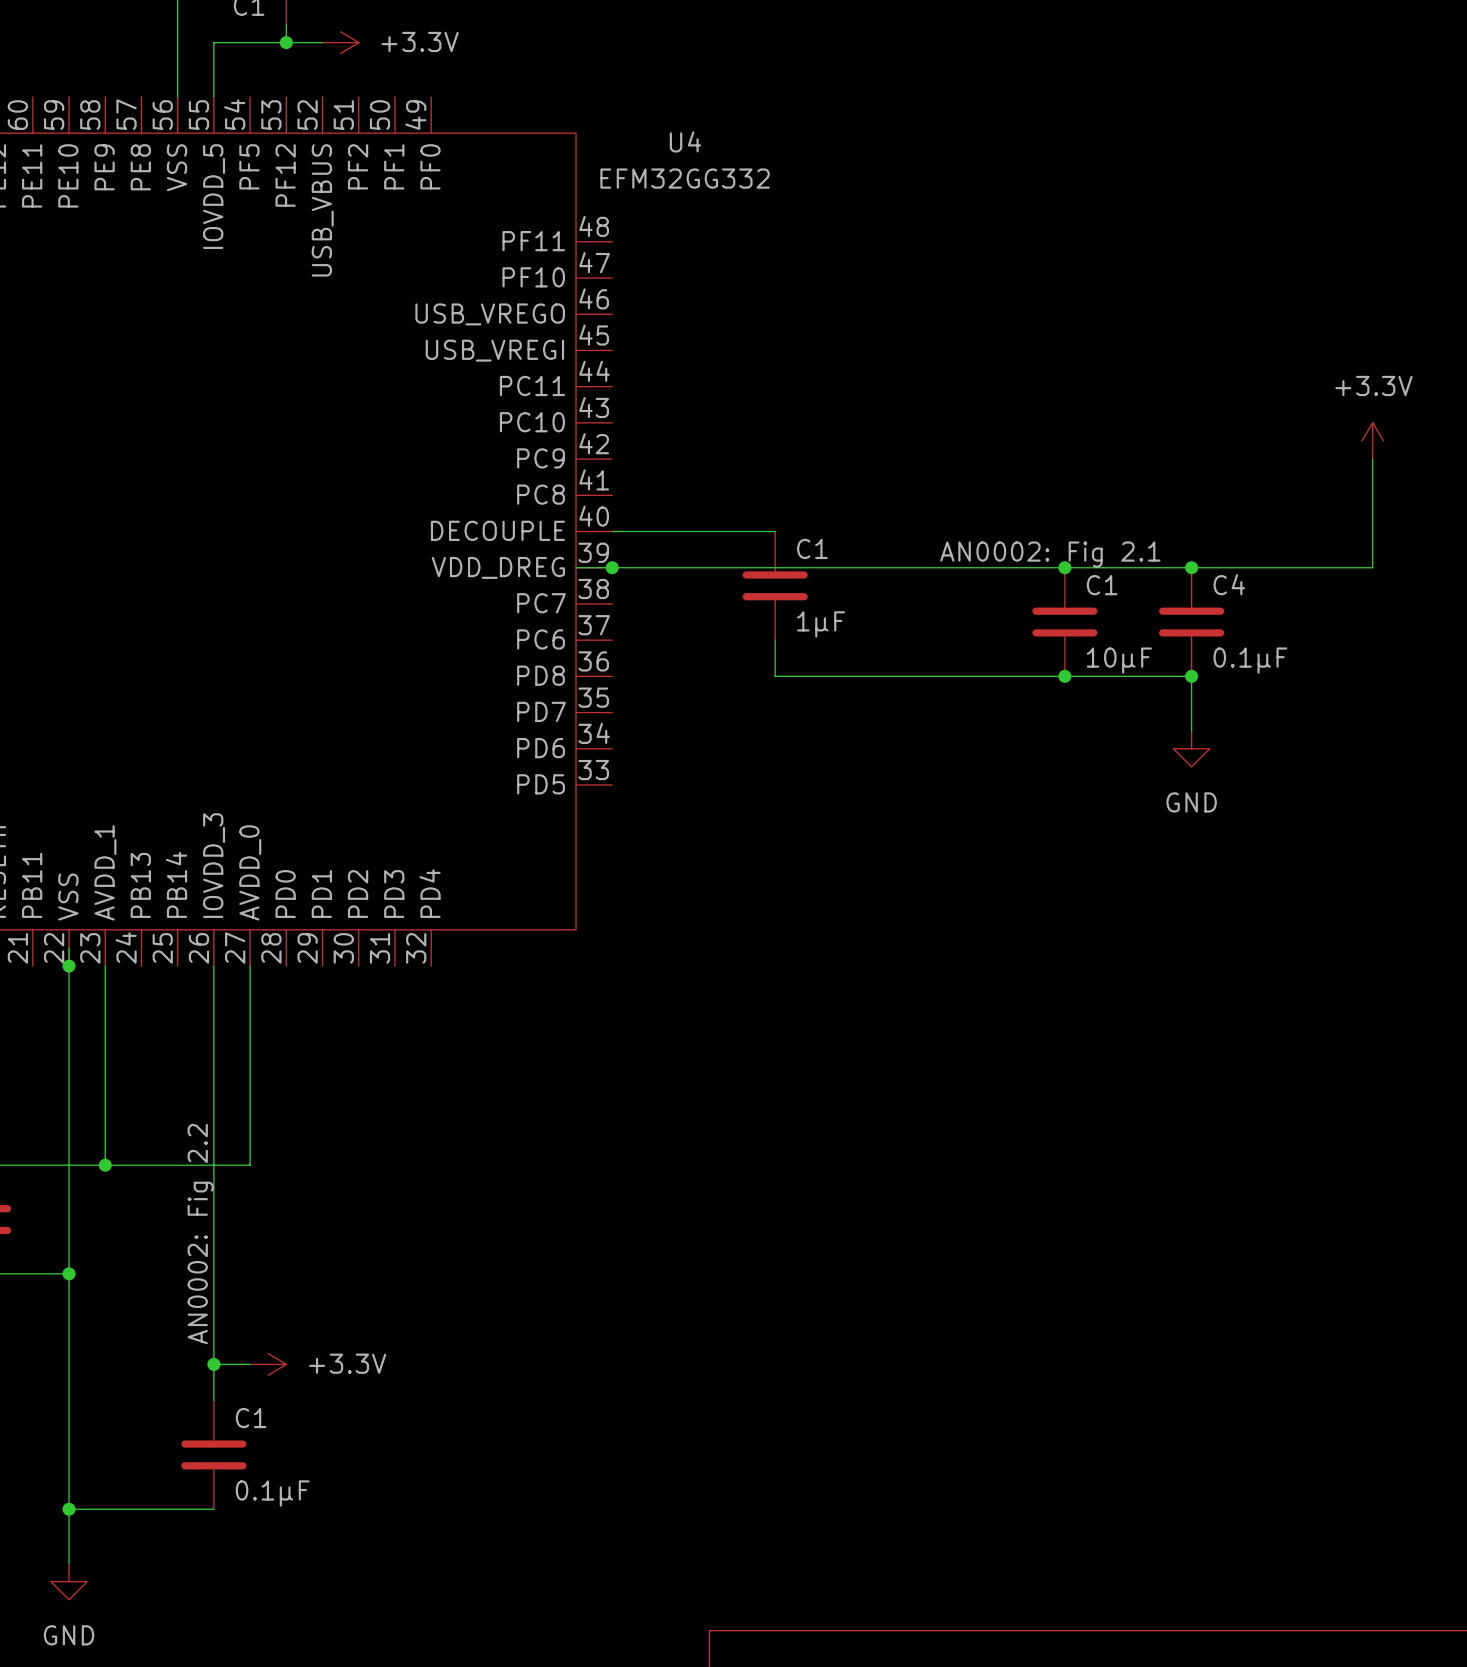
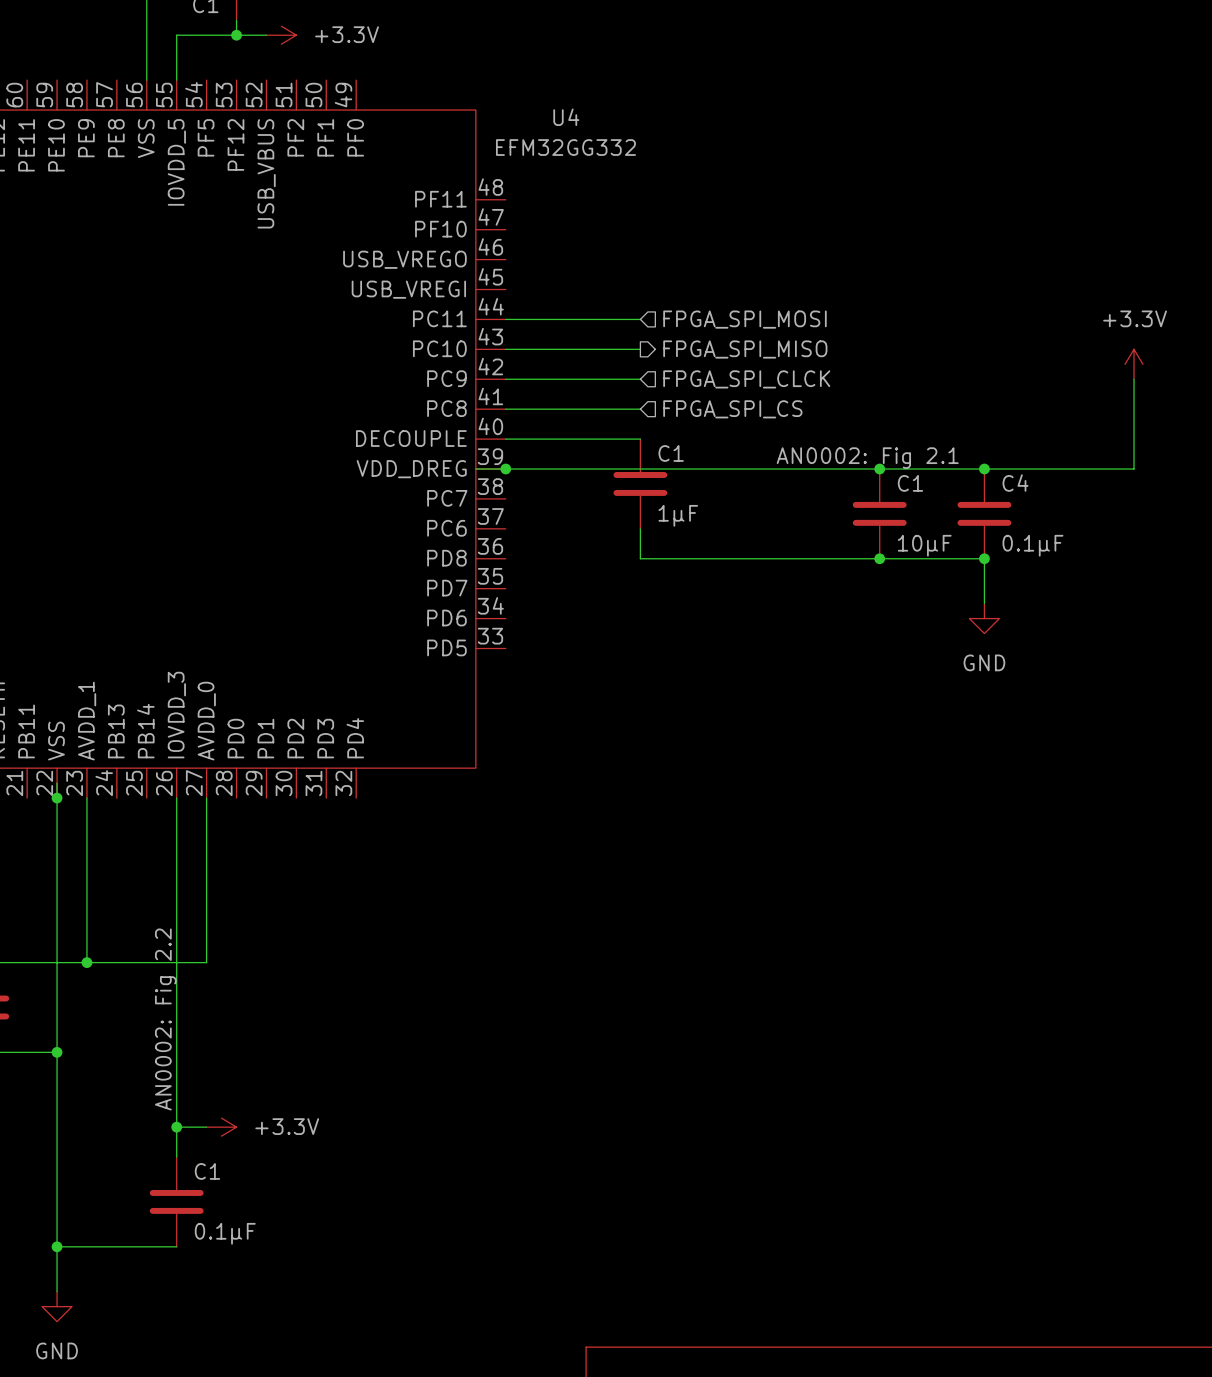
wire: none -> (505, 319) (640, 319)
hierarchical label: none -> FPGA_SPI_MOSI (744, 319)
wire: none -> (505, 349) (640, 349)
hierarchical label: none -> FPGA_SPI_MISO (745, 349)
wire: none -> (505, 379) (640, 379)
hierarchical label: none -> FPGA_SPI_CLCK (746, 379)
wire: none -> (505, 409) (640, 409)
hierarchical label: none -> FPGA_SPI_CS (732, 409)

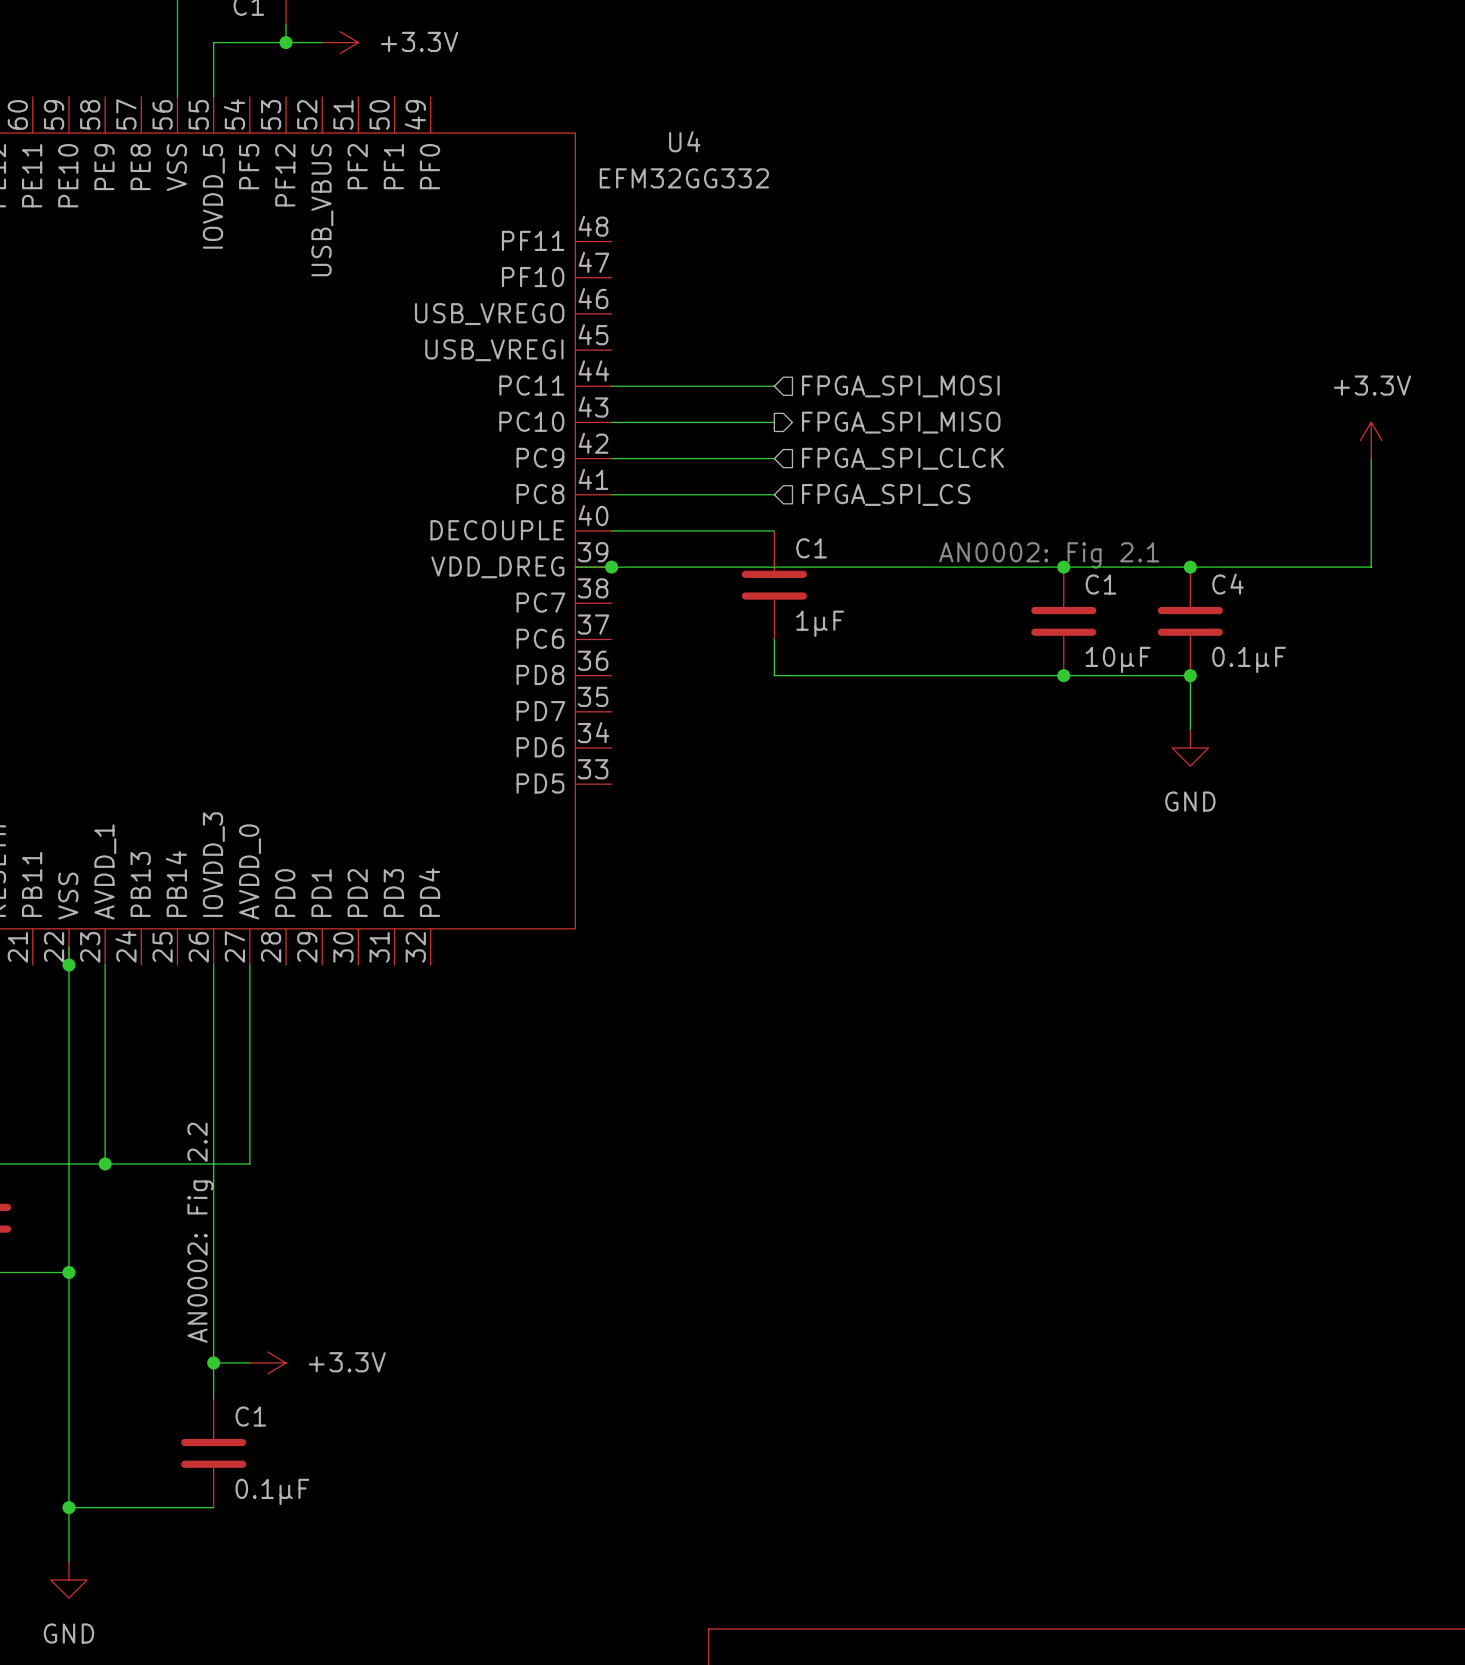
label: AN0002: Fig 2.1 (867, 458) -> none
text: none -> AN0002: Fig 2.1 (1049, 555)

